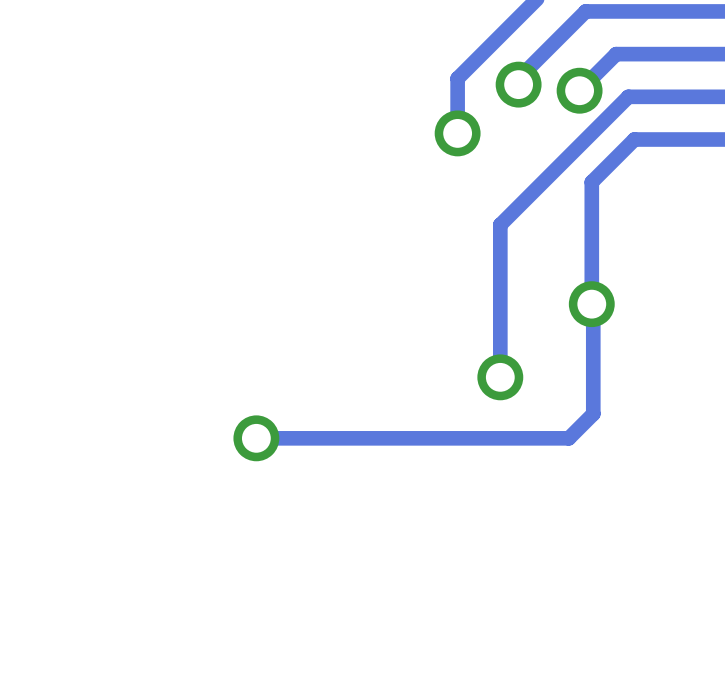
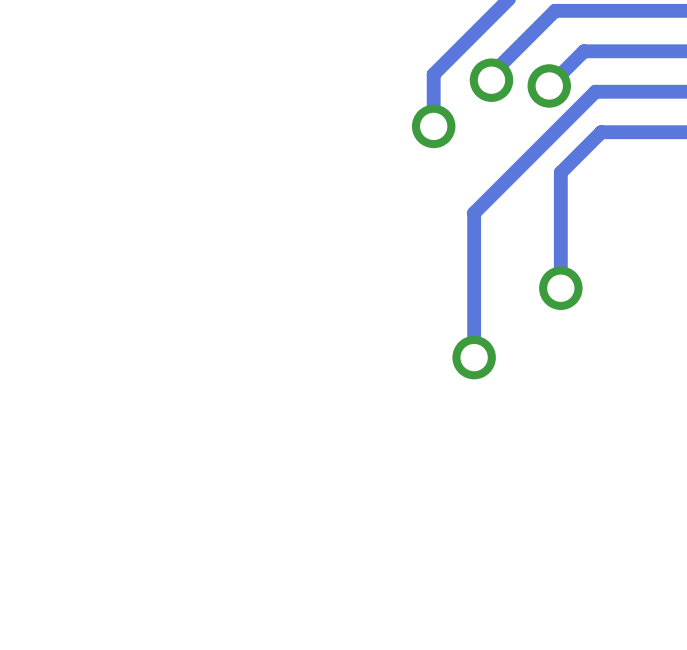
track: (591, 304) (593, 413) (568, 438) (256, 438) -> none
via: (256, 438) -> none

